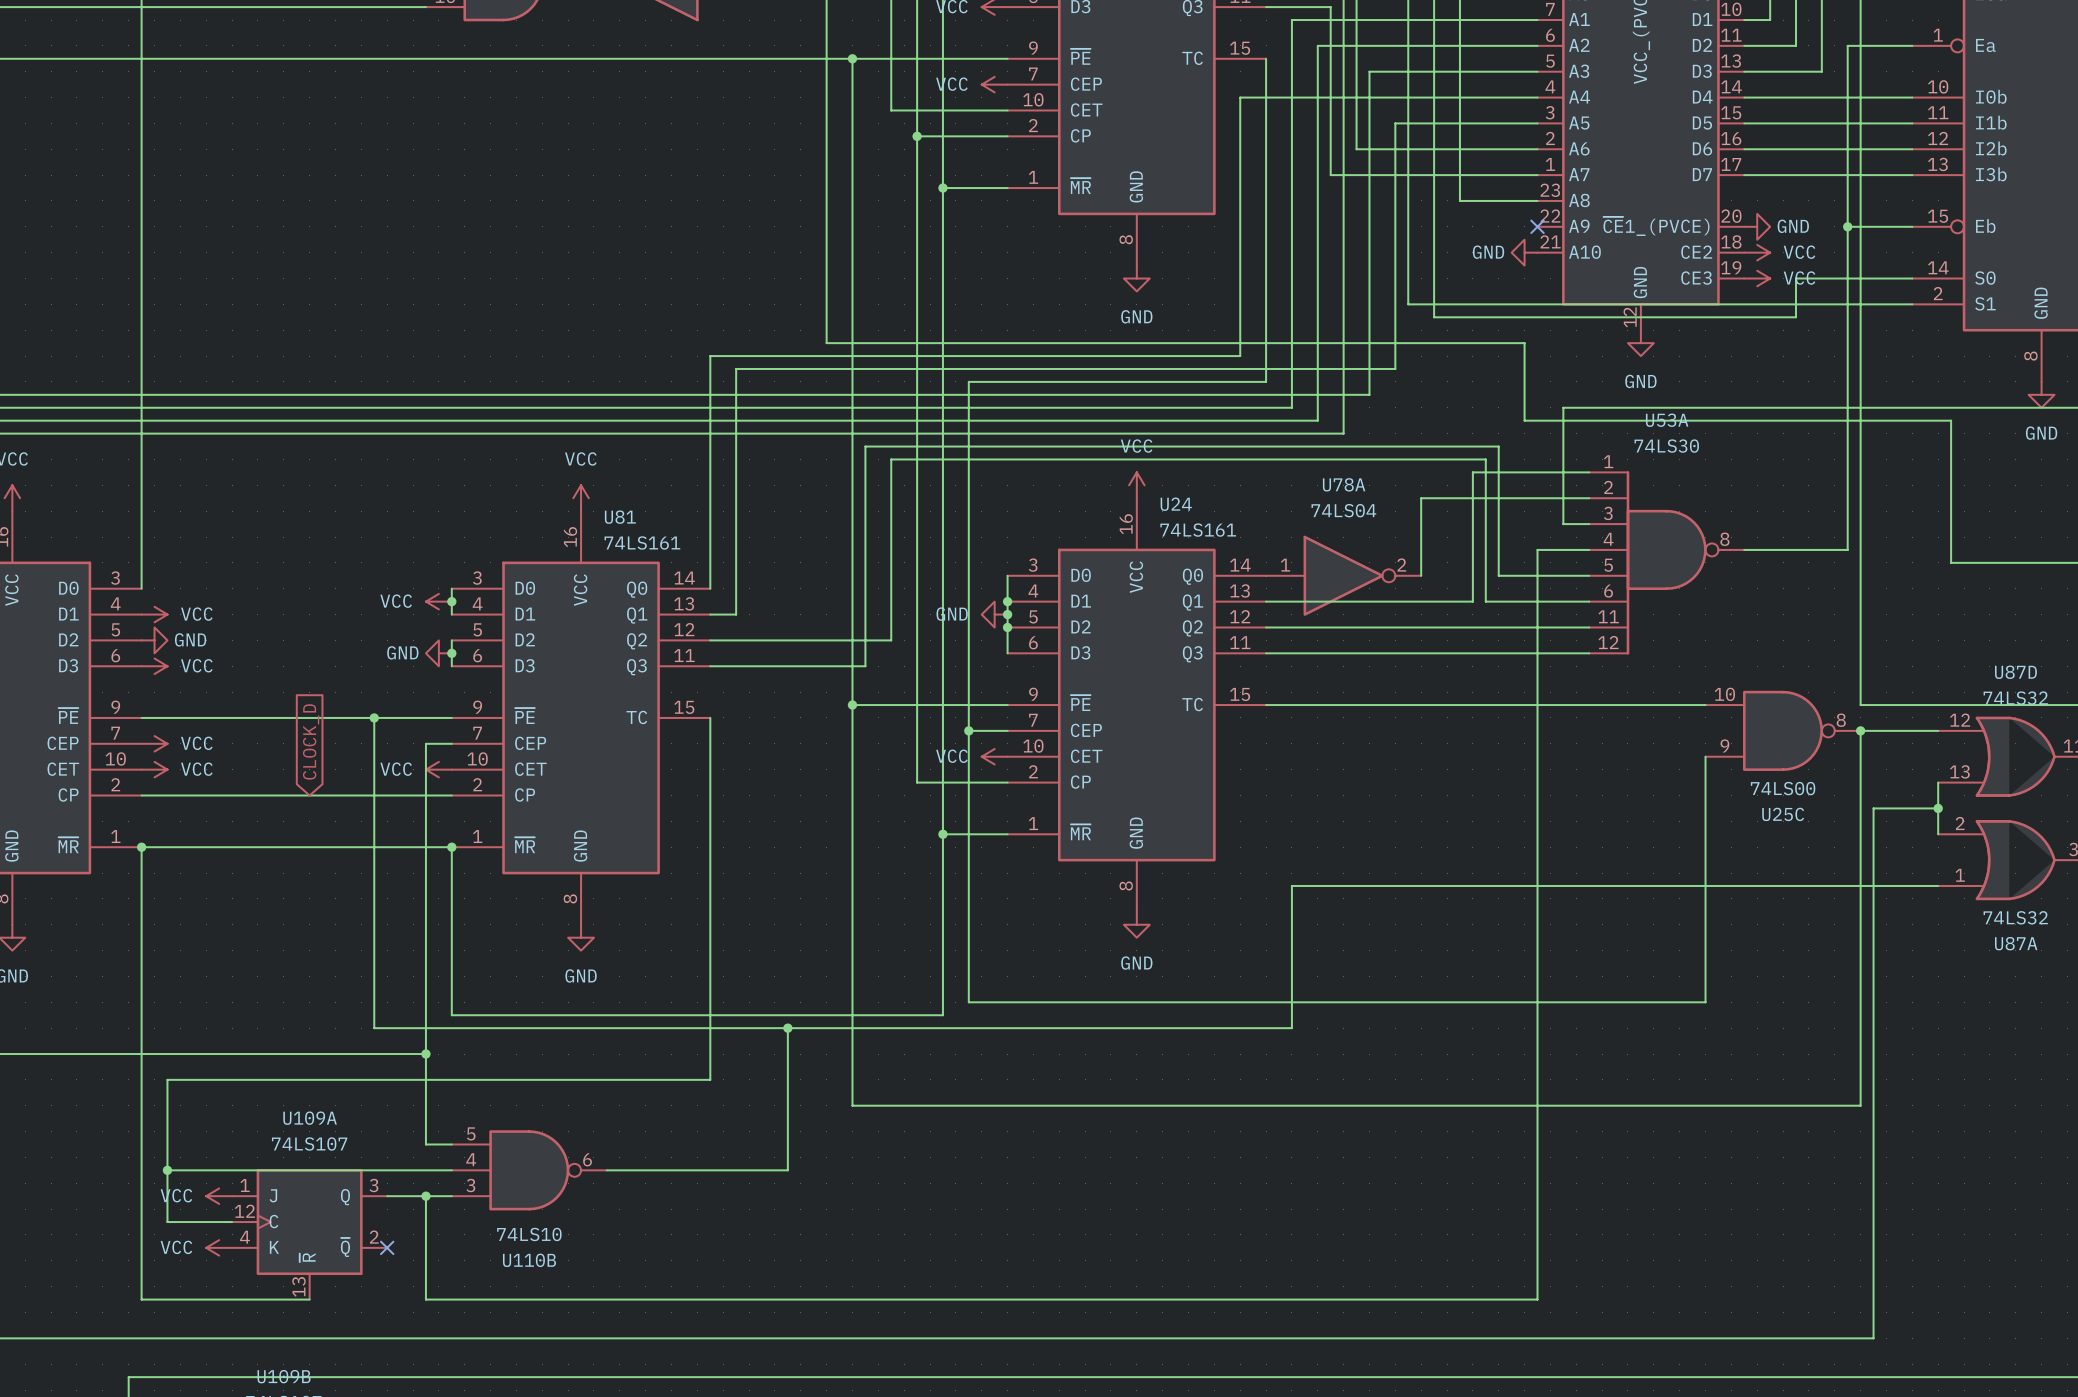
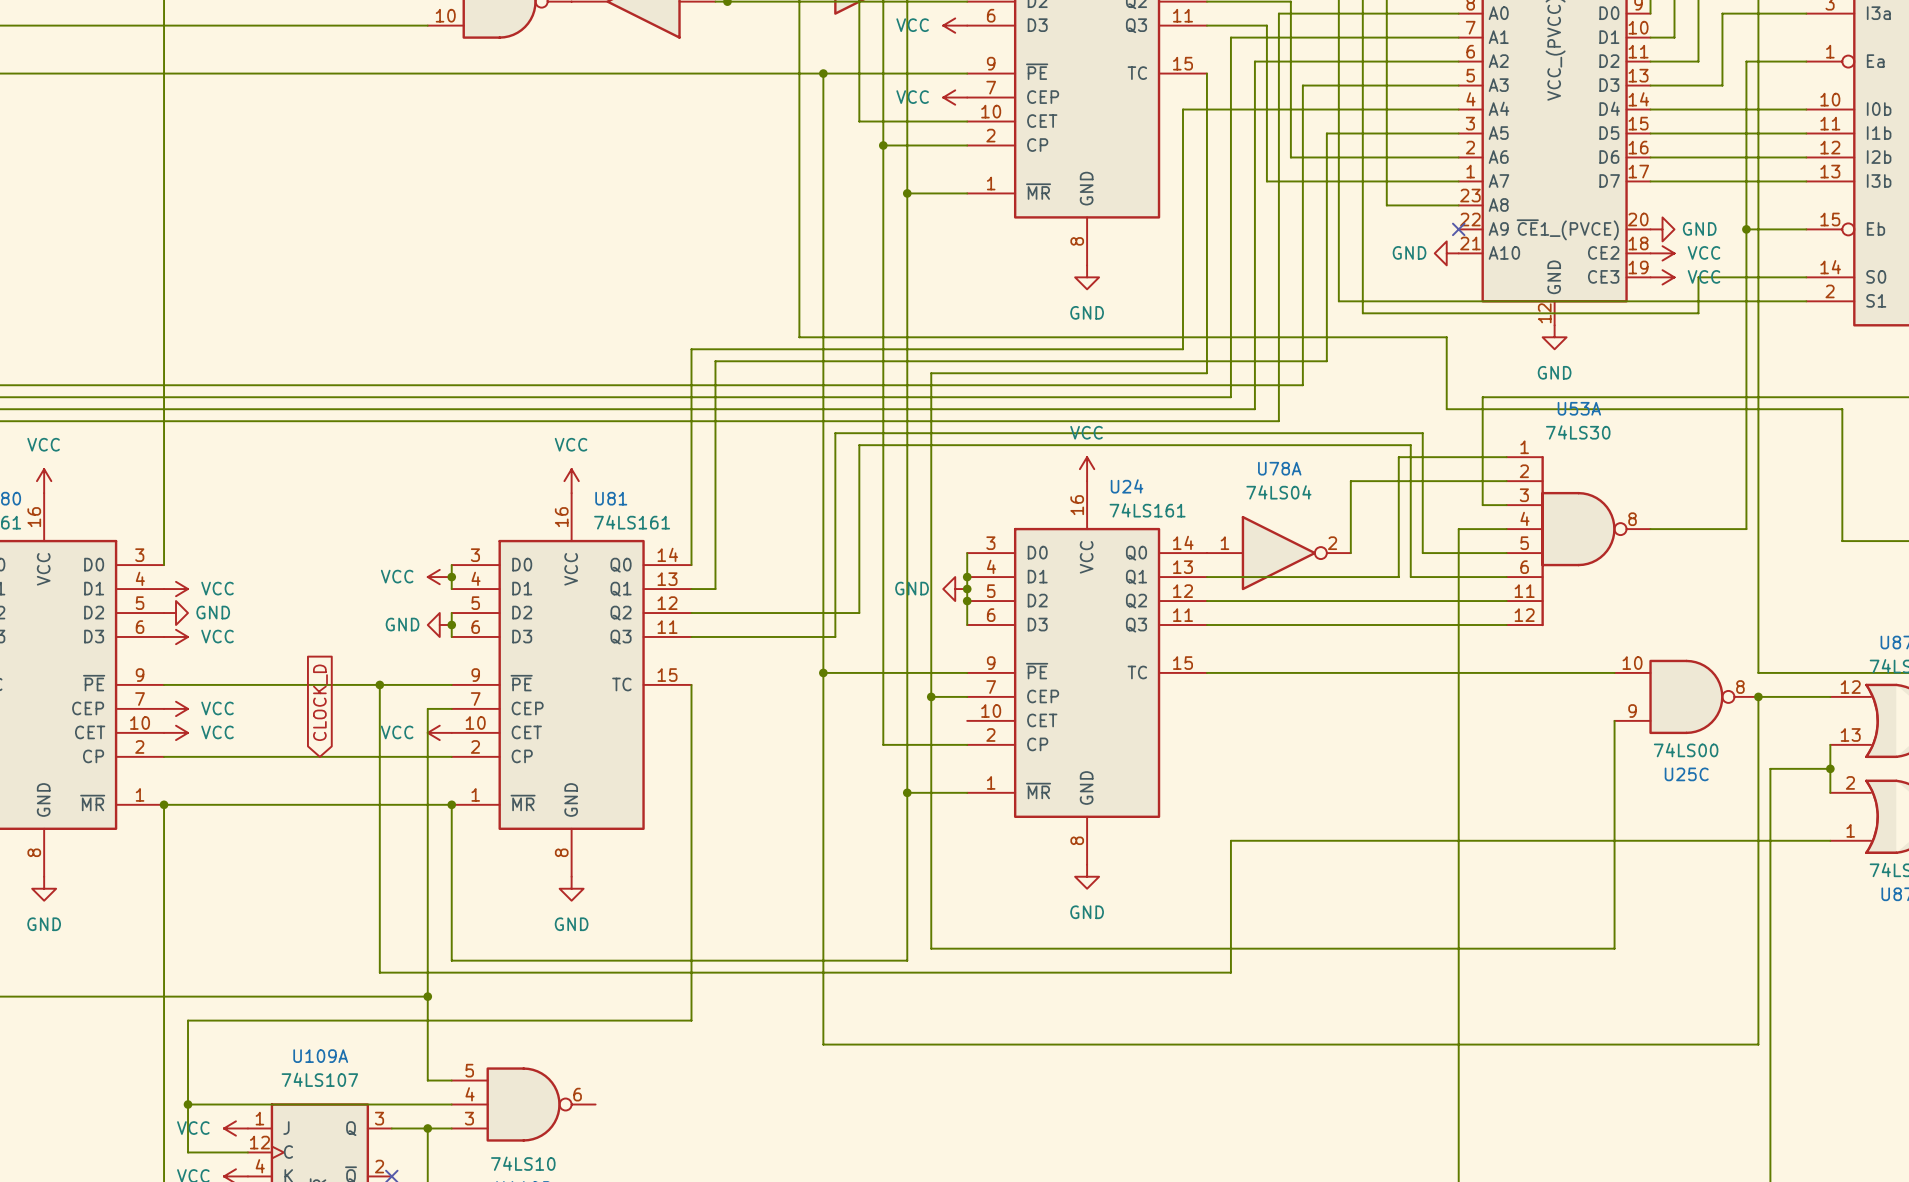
power symbol: VCC (994, 756) -> none
wire: (787, 1028) (787, 1170) (606, 1170) -> none
junction: (787, 1028) -> none

